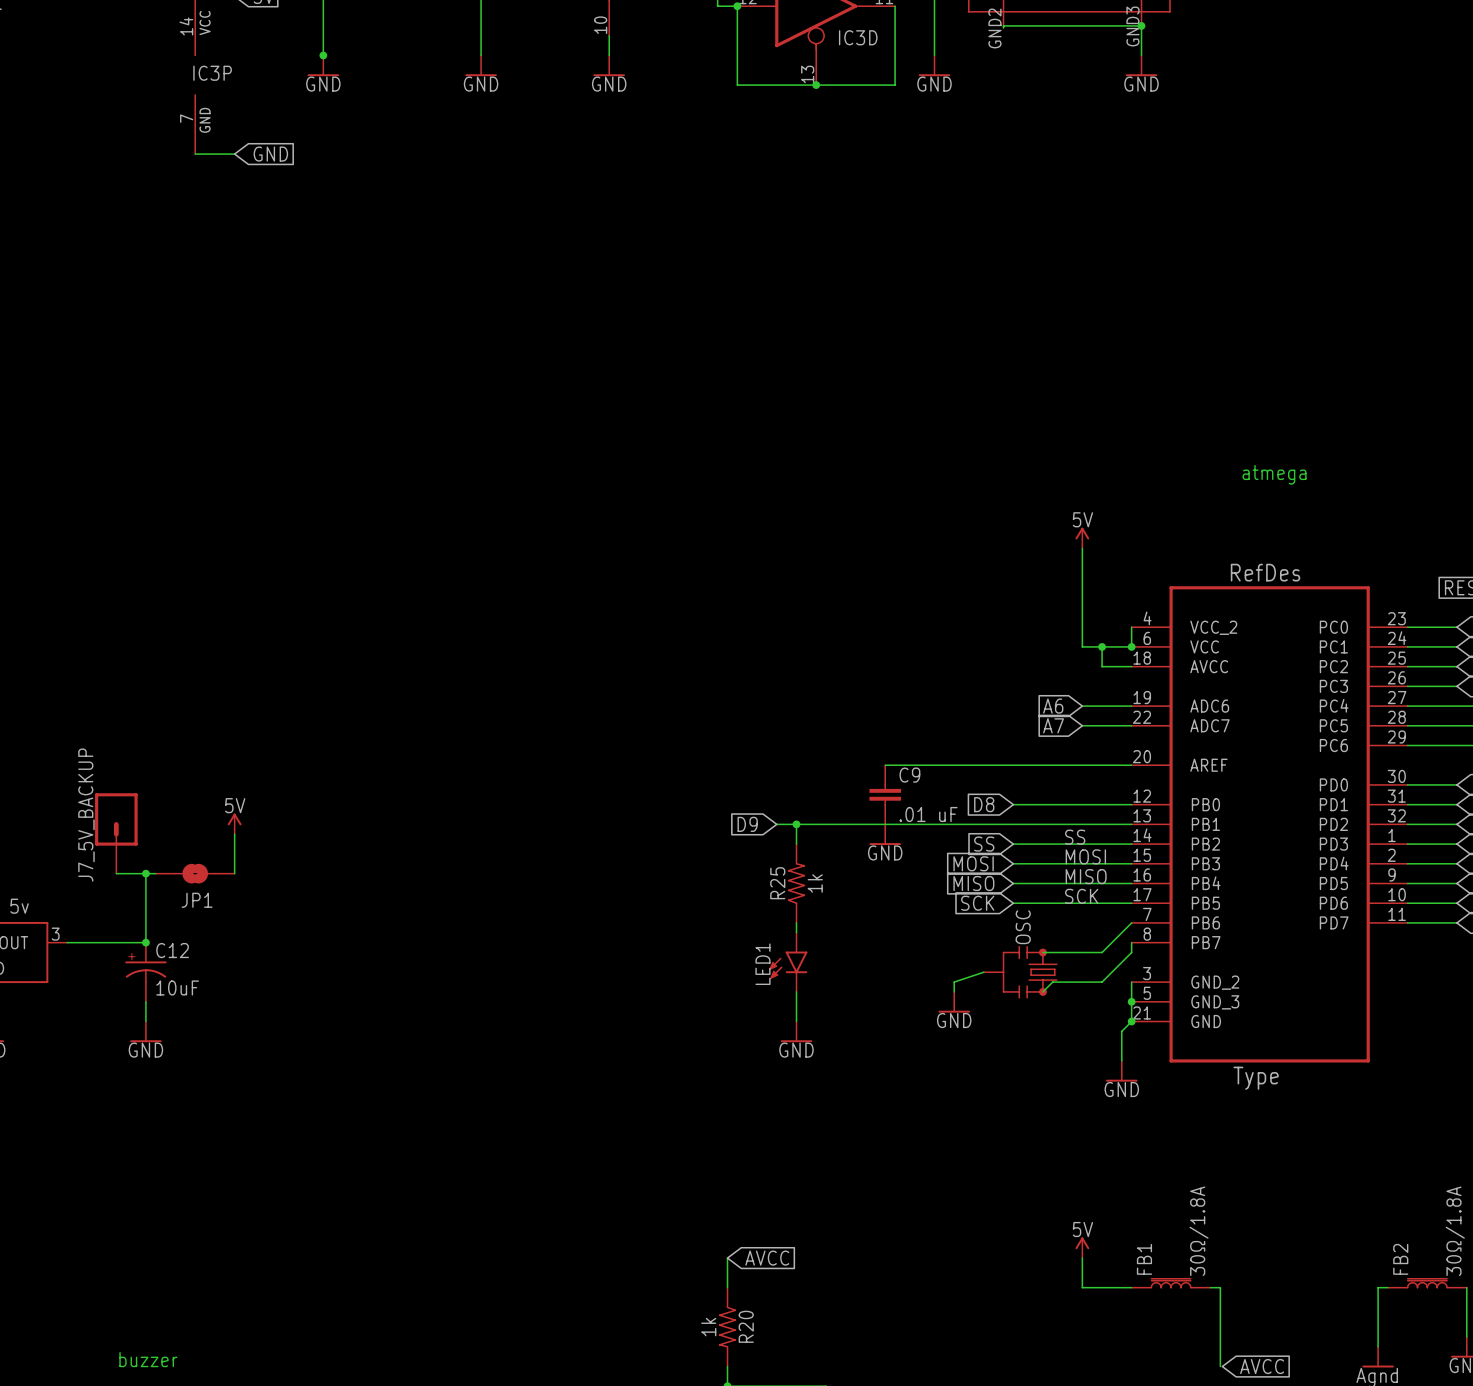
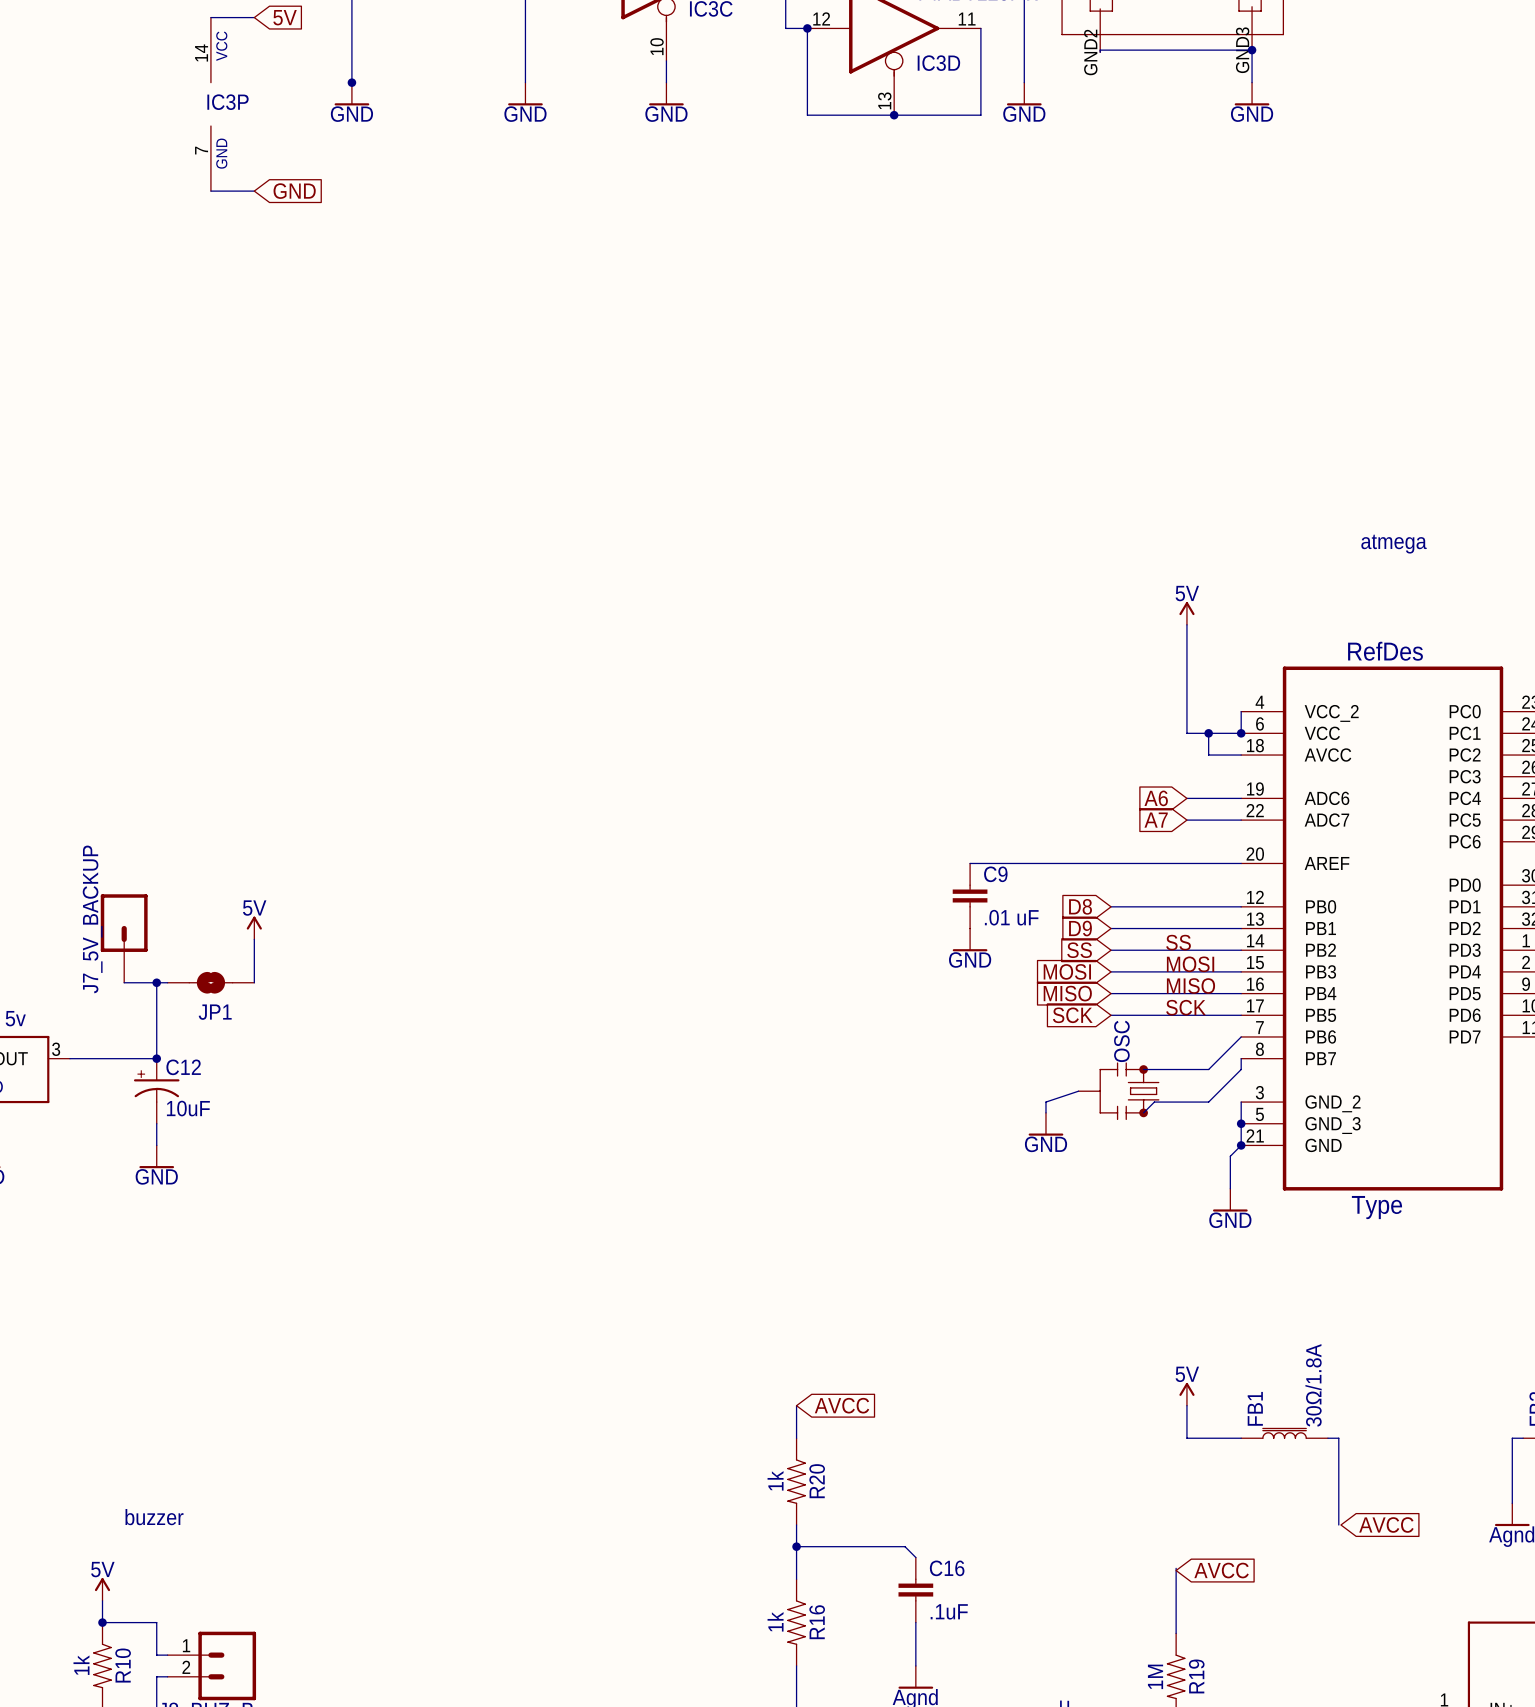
global label: D9 (747, 824) -> none
wire: (776, 824) (1013, 824) -> none
wire: (796, 824) (796, 844) -> none
junction: (796, 824) -> none
global label: none -> D9 (1080, 928)
R25: 1k (796, 883) -> none
wire: (796, 922) (796, 932) -> none
LED1: (788, 962) -> none
wire: (796, 991) (796, 1021) -> none
power symbol: GND (796, 1031) -> none

